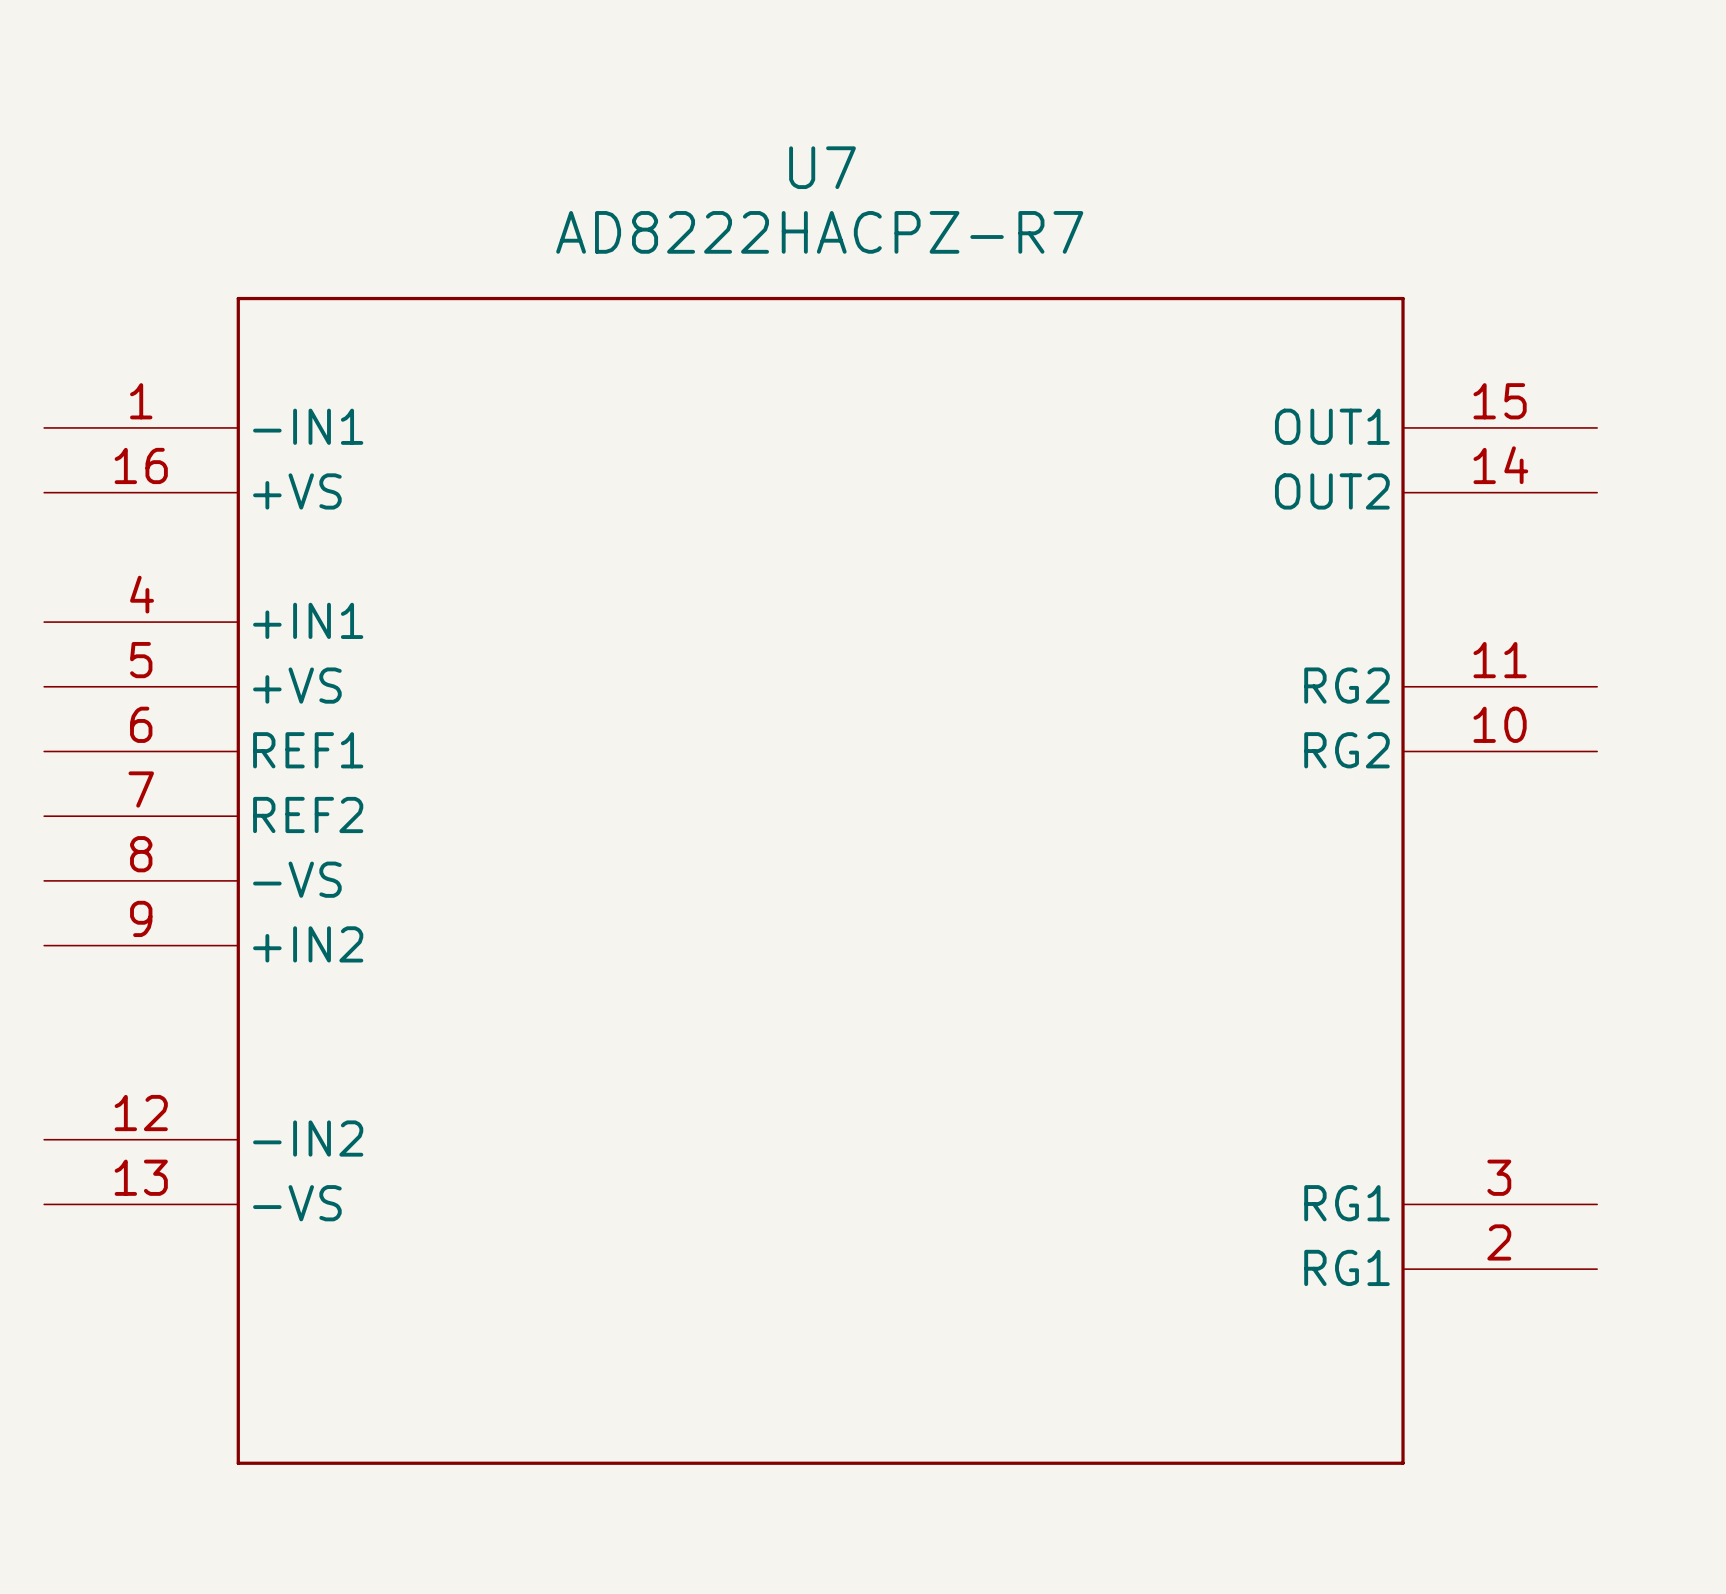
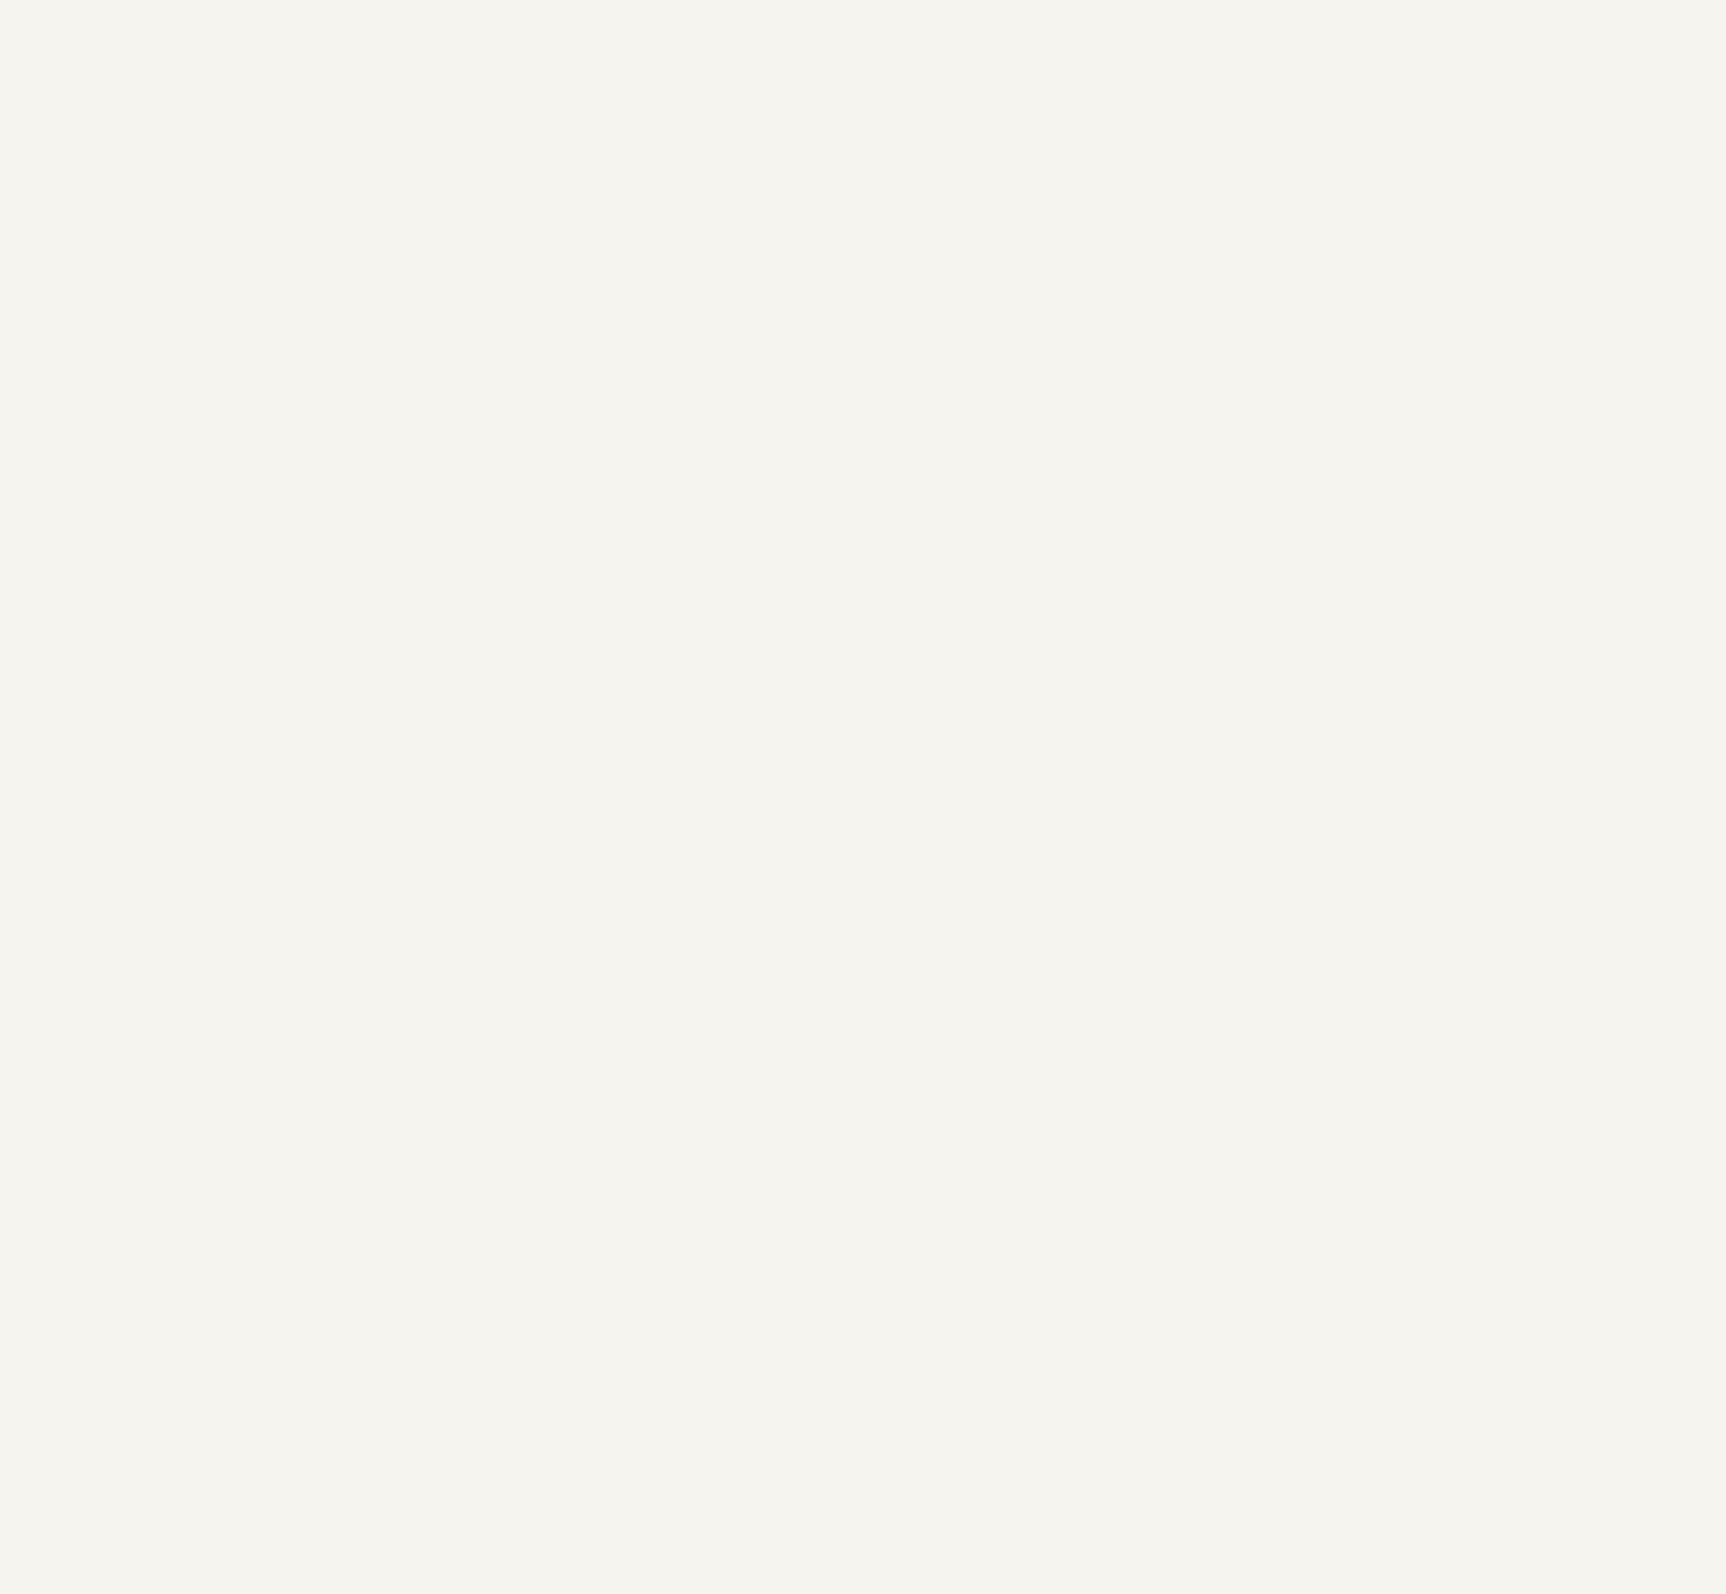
U7: AD8222HACPZ-R7 (820, 880) -> none

